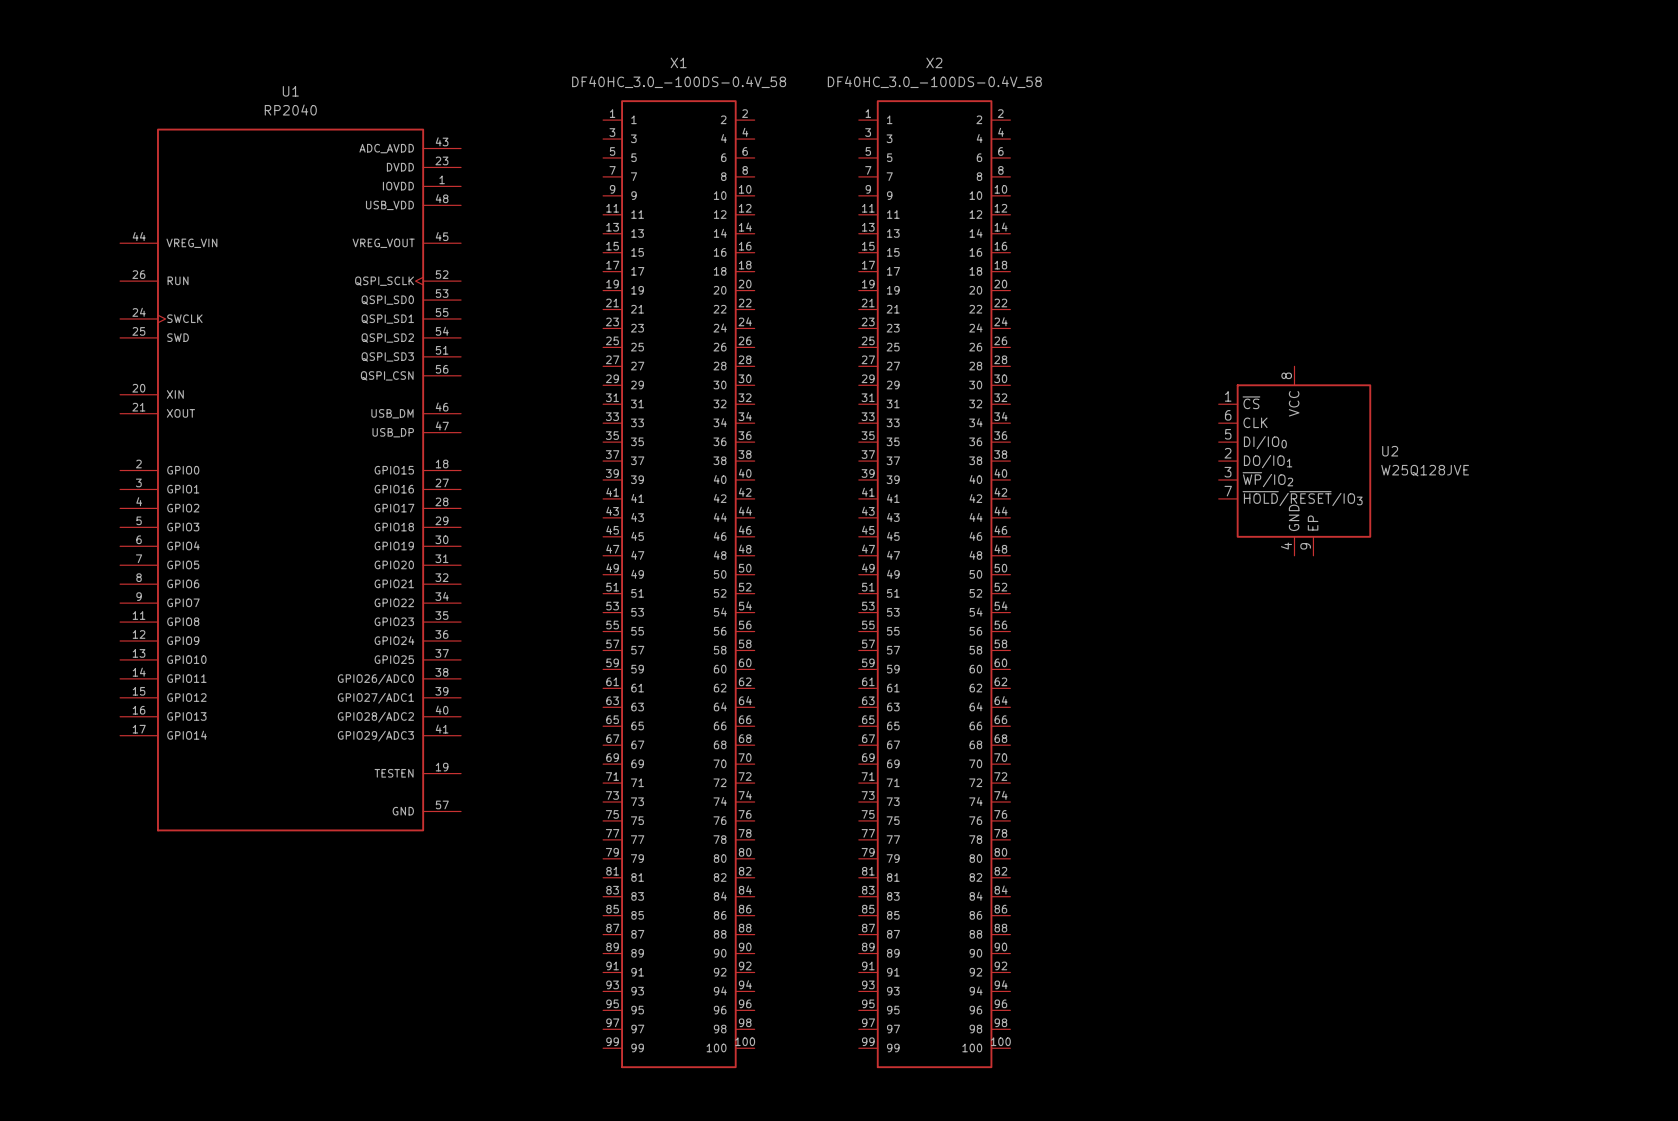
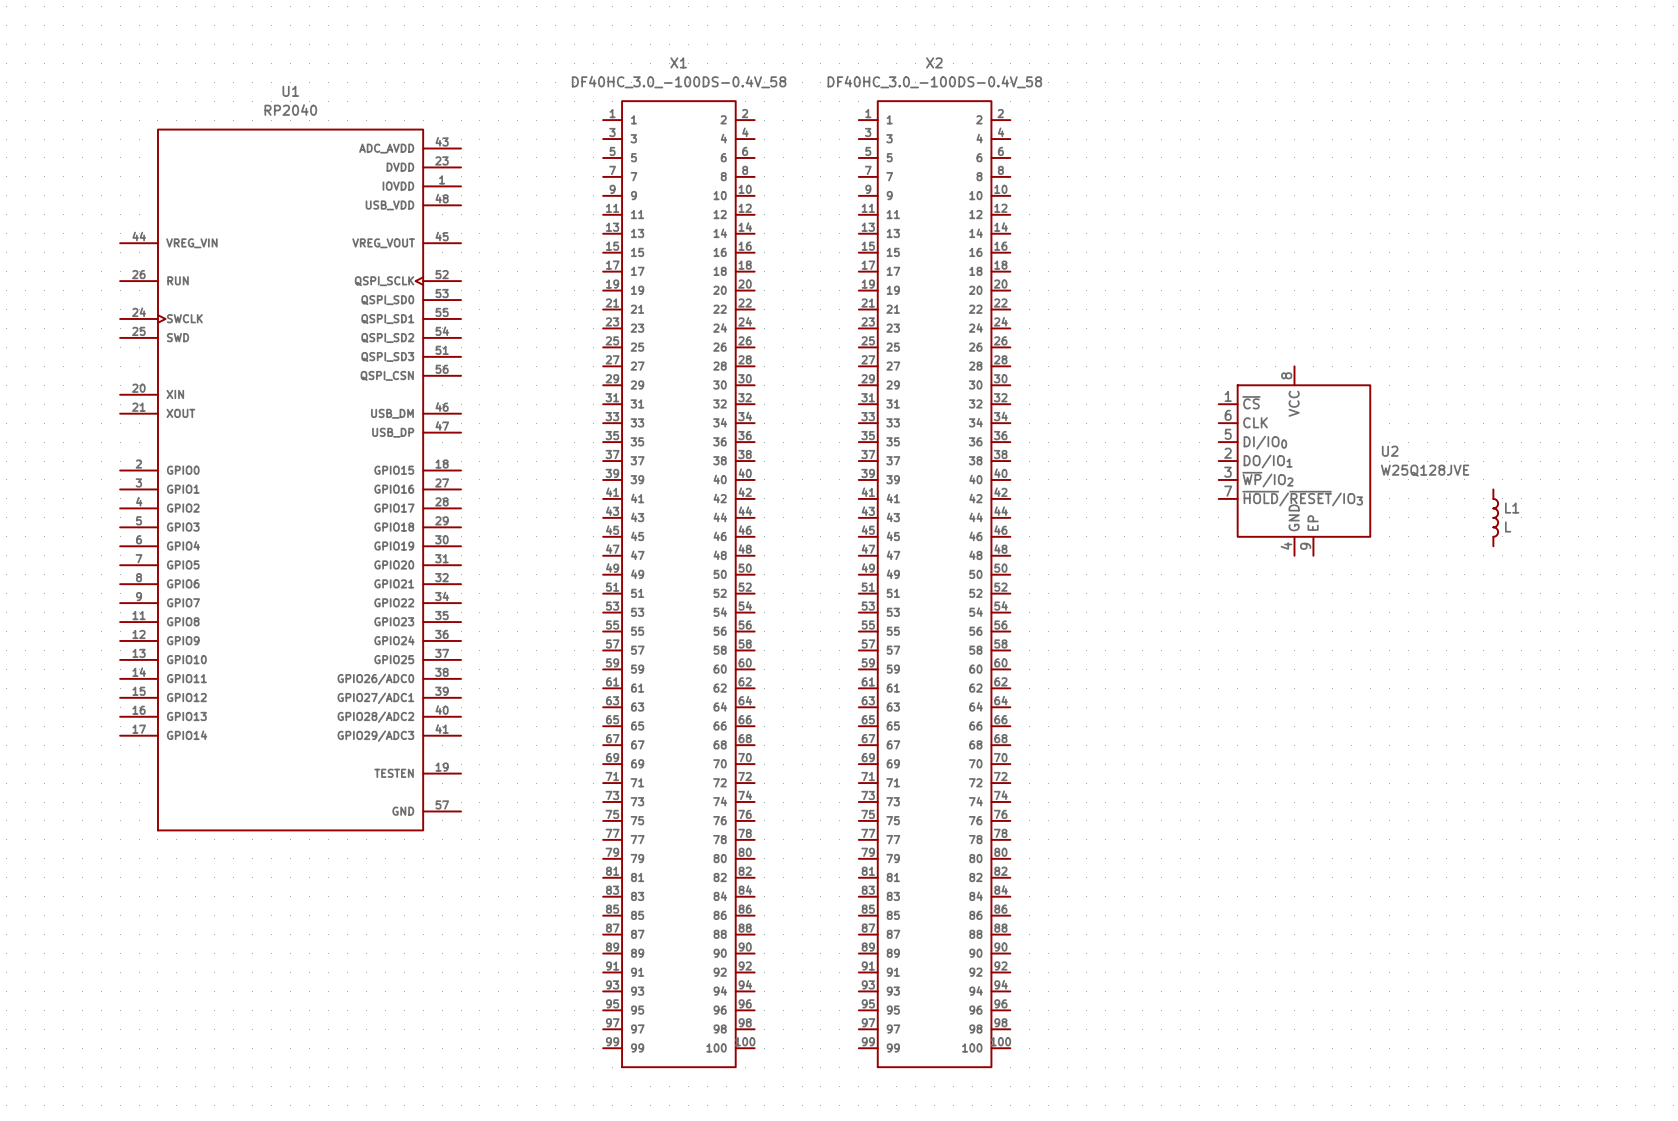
L1: none -> L (1495, 517)

